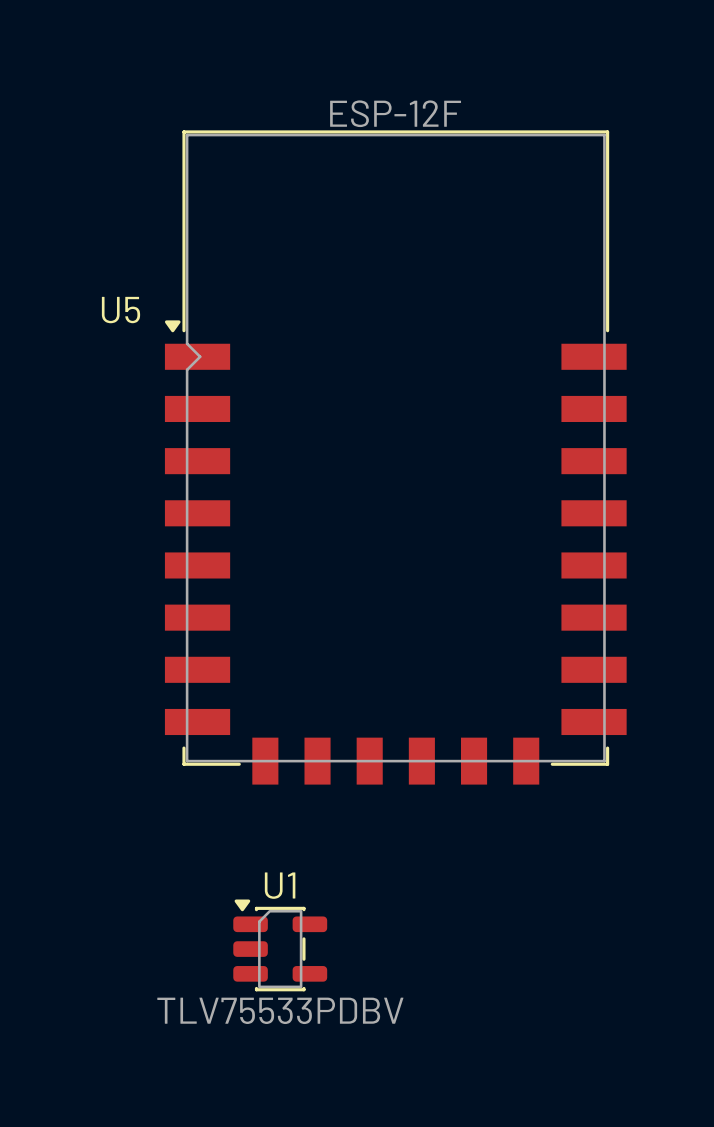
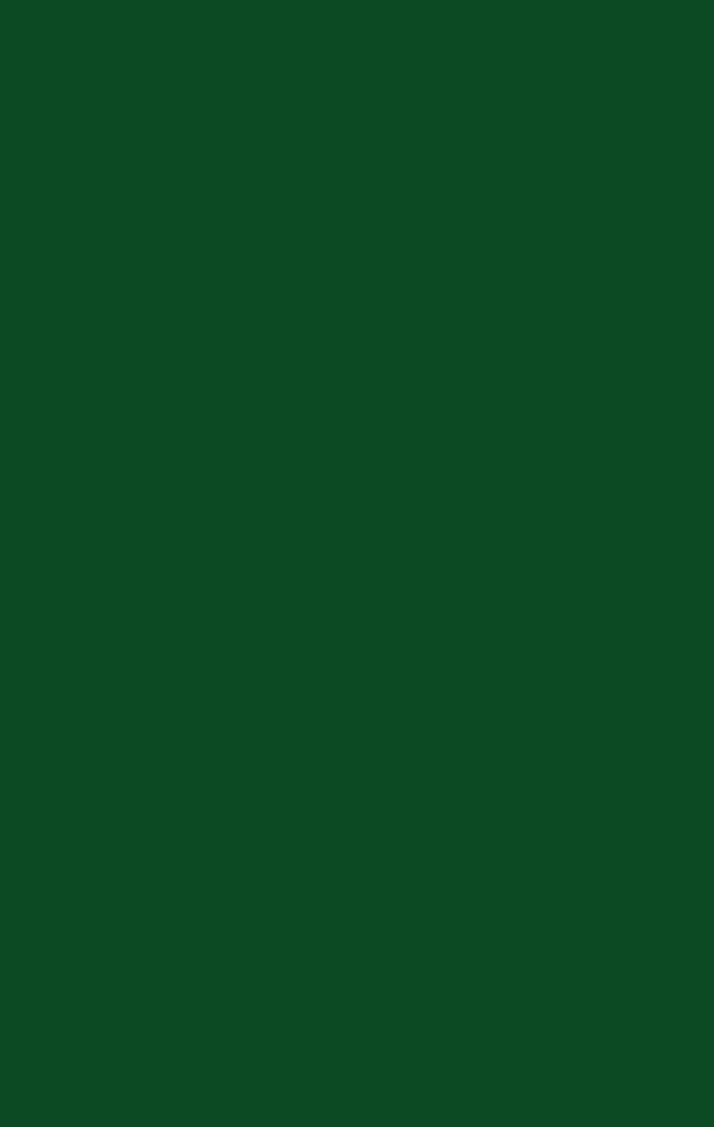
U5: ESP-12F (395, 457) -> none
U1: TLV75533PDBV (280, 945) -> none

